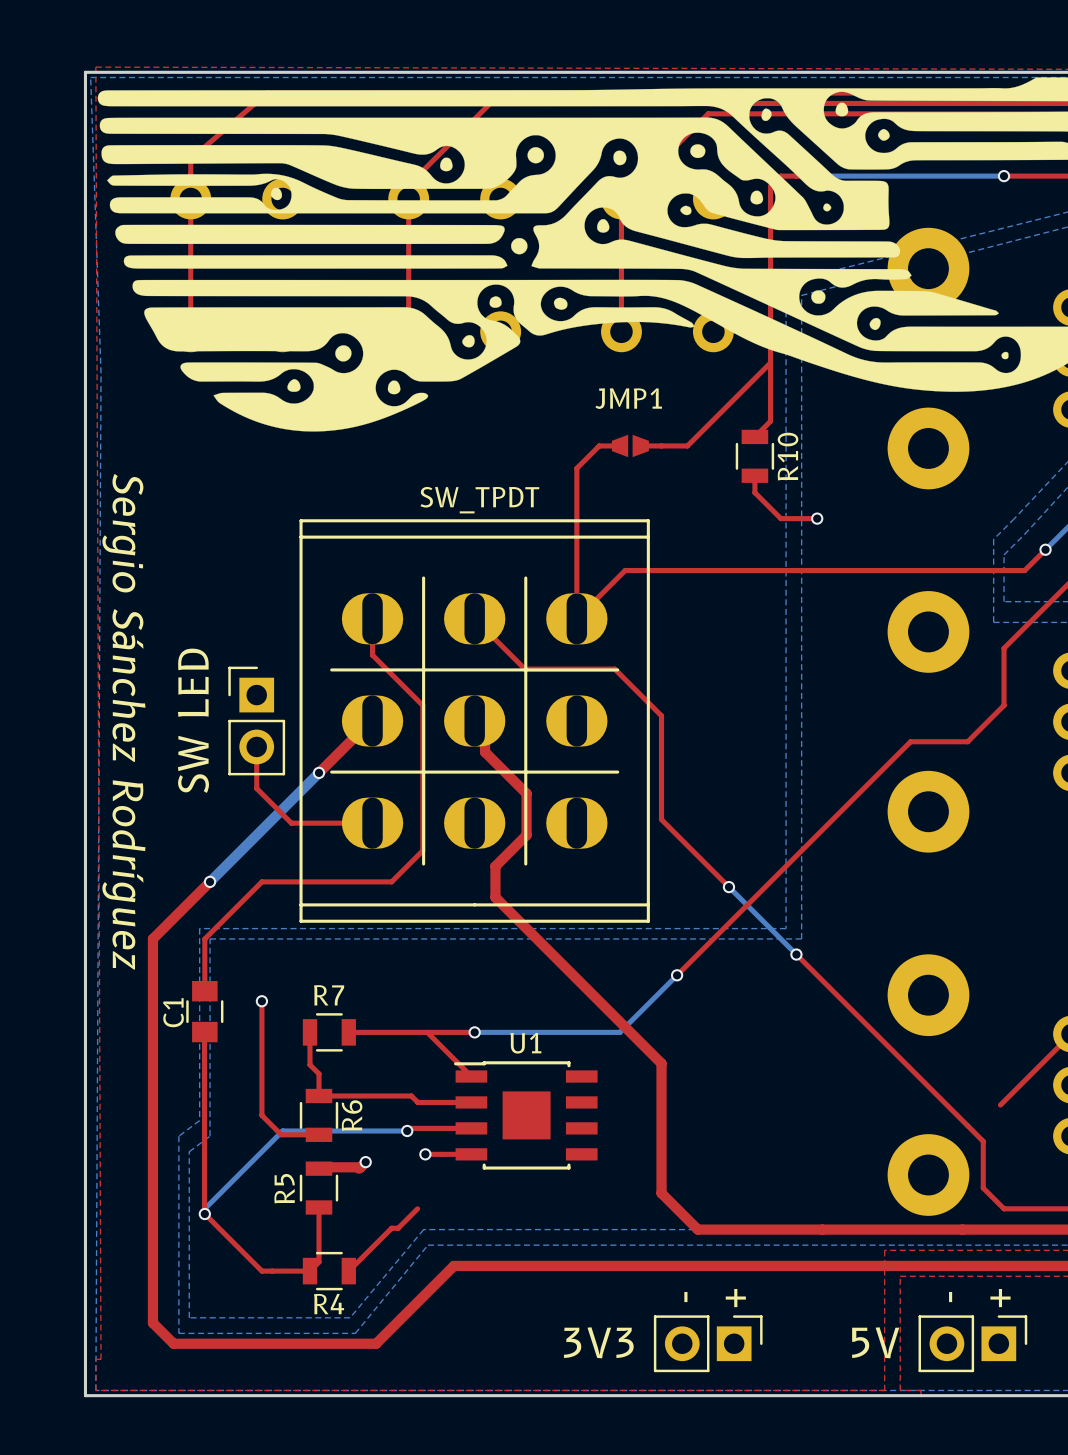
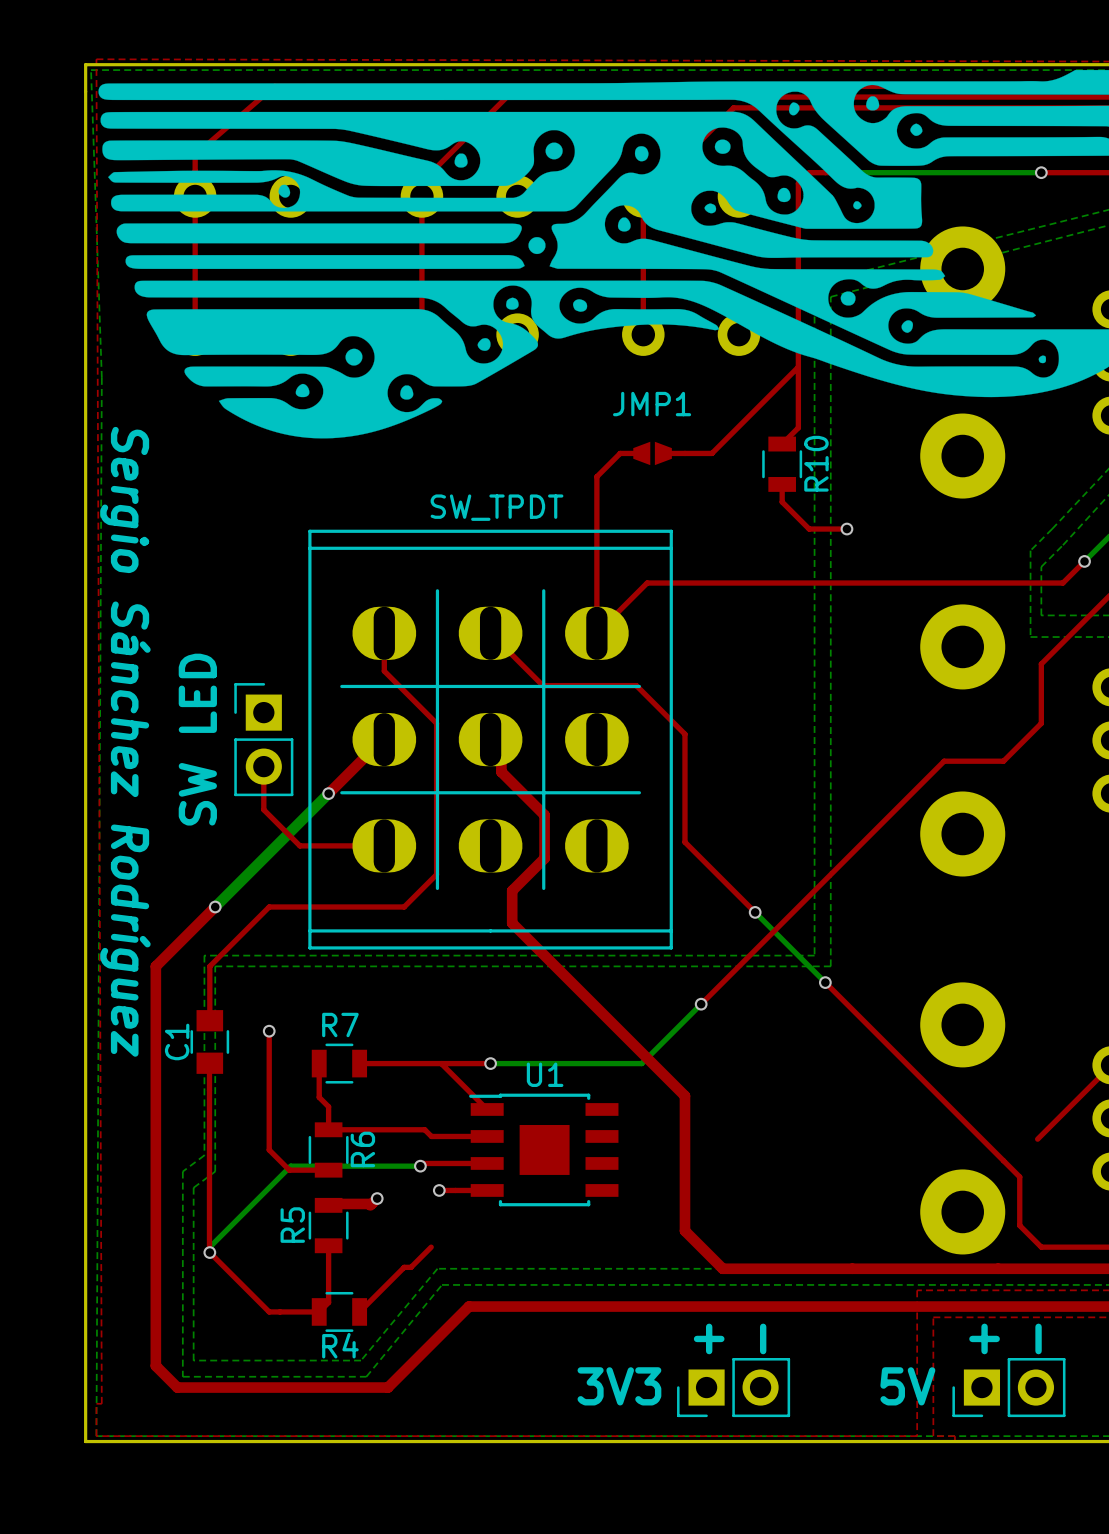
text: - (685, 1297) -> + (709, 1338)
text: - (950, 1297) -> + (984, 1338)
text: + (735, 1298) -> - (763, 1338)
text: + (1000, 1298) -> - (1038, 1338)
part rotation: 0° (708, 1343) -> 180° (733, 1387)
part rotation: 0° (972, 1343) -> 180° (1008, 1387)

